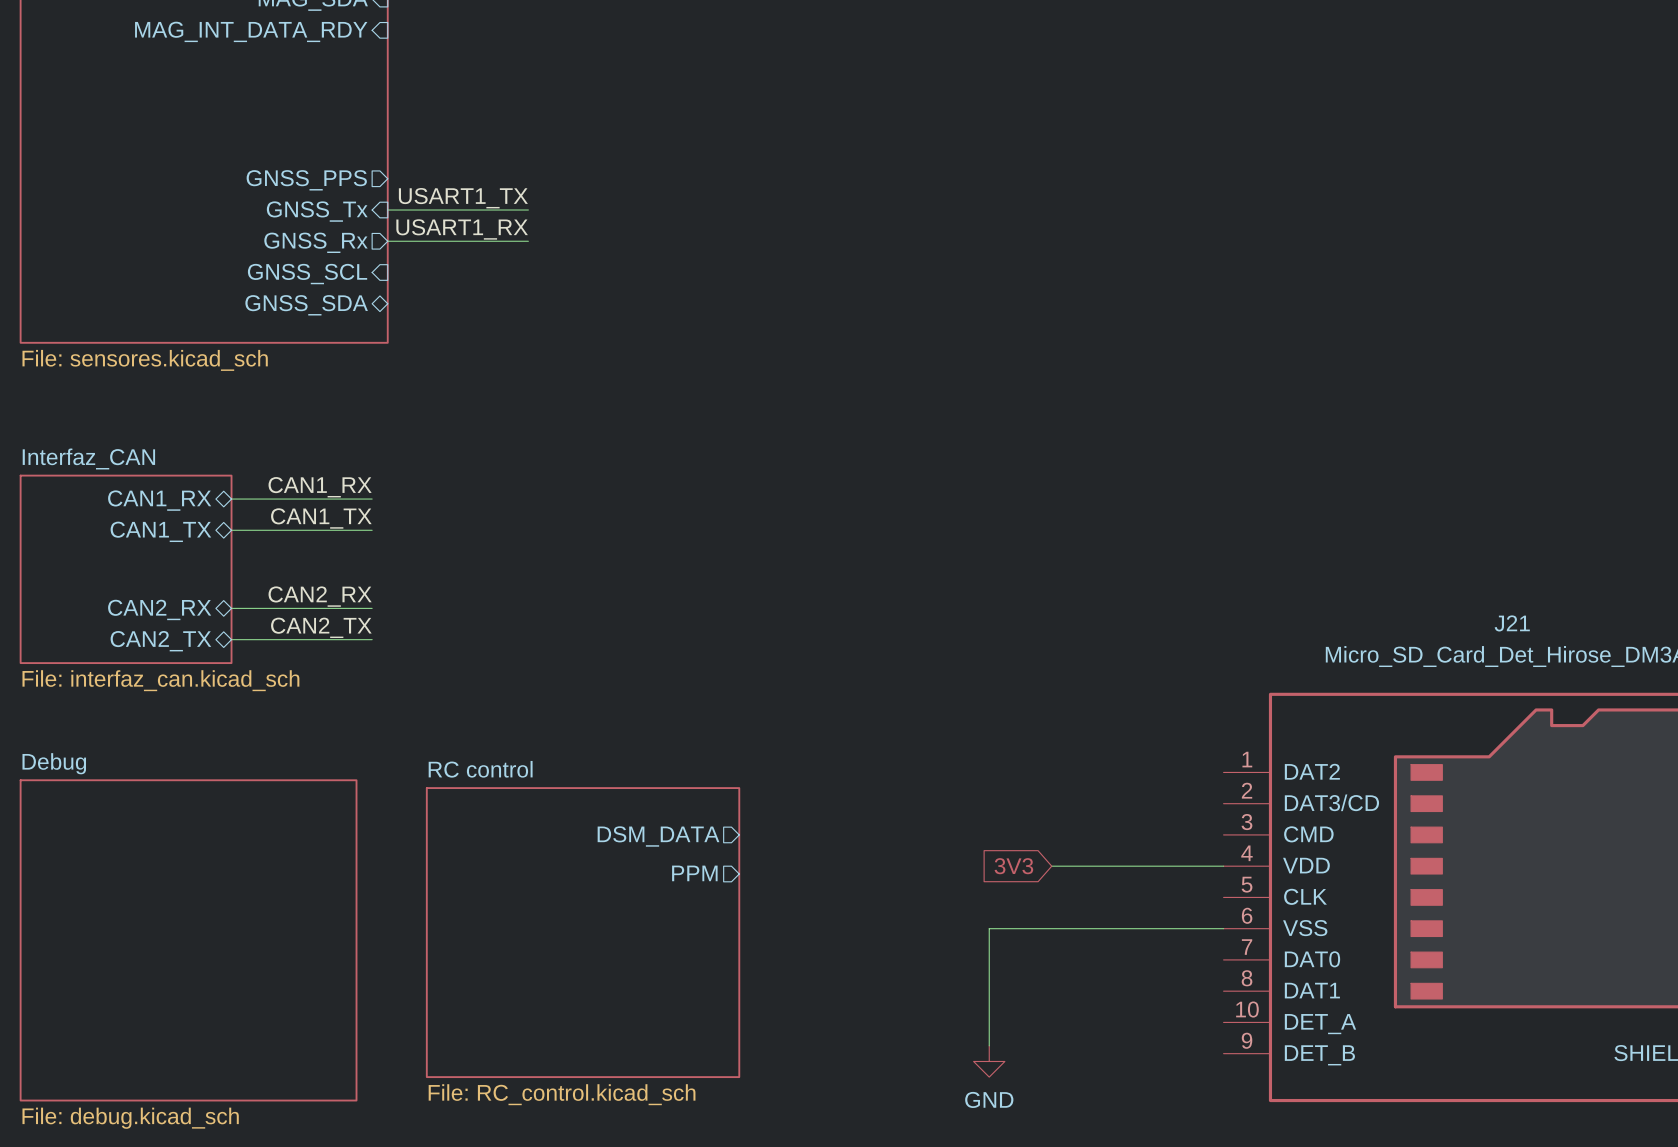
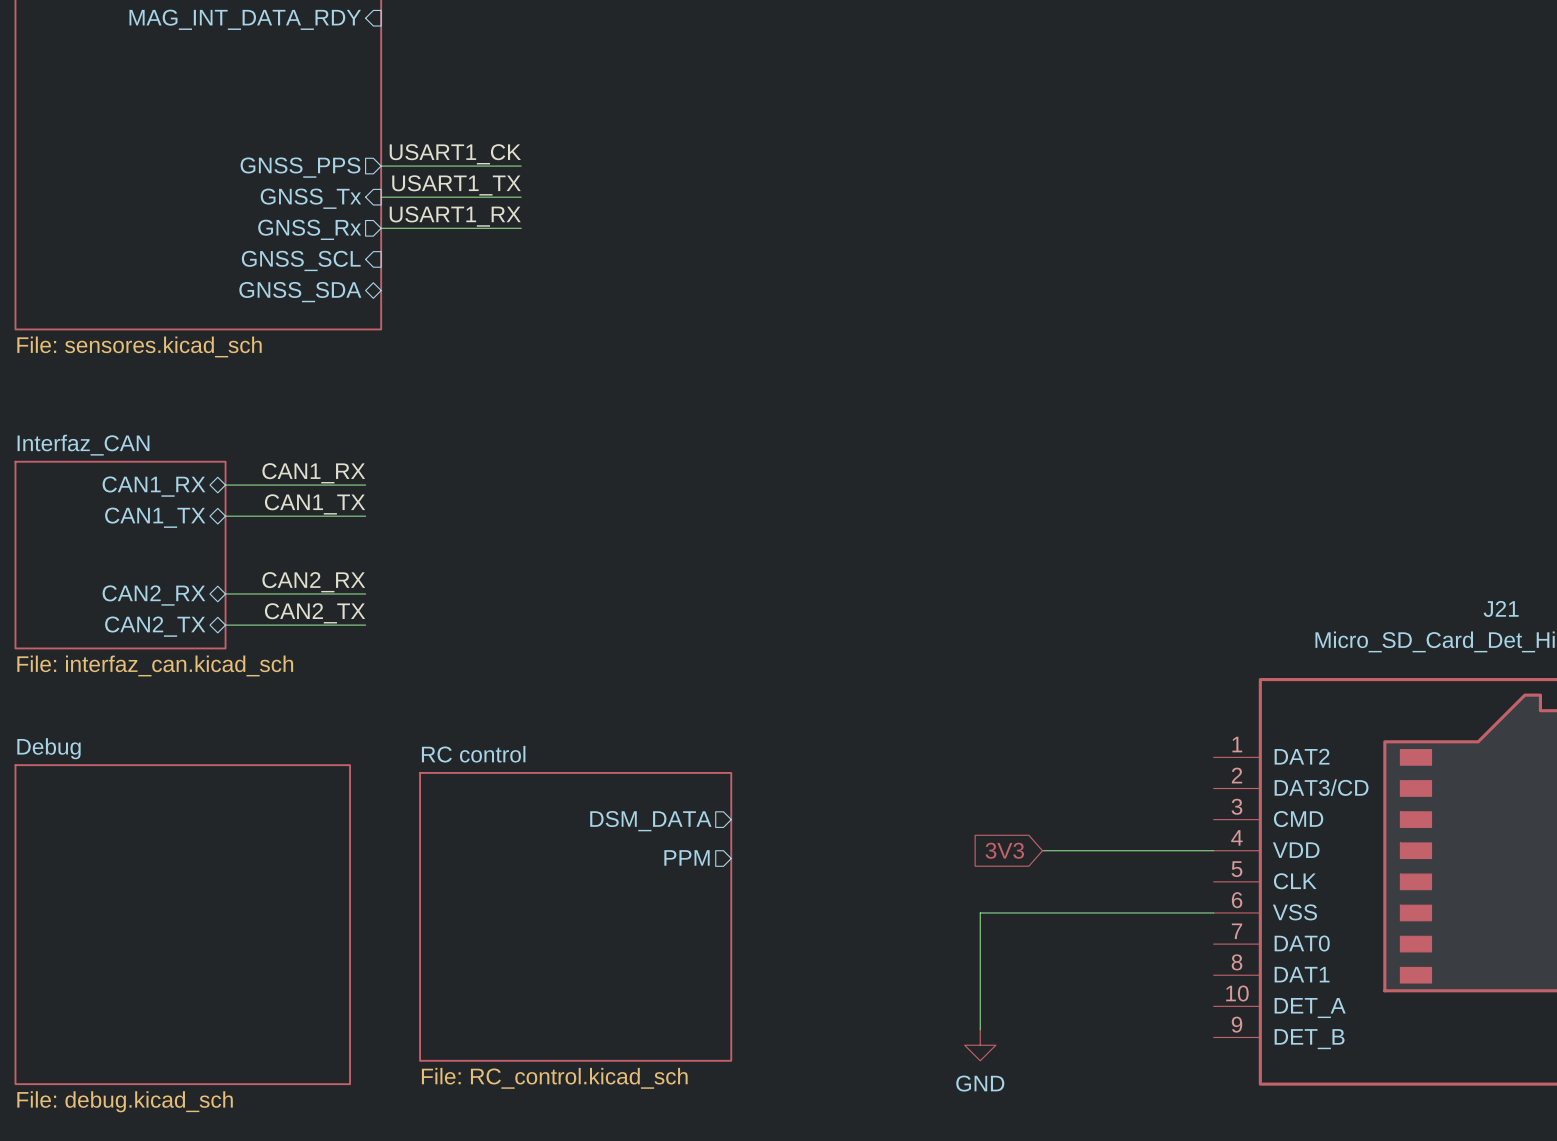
label: none -> USART1_CK (455, 154)
wire: none -> (381, 166) (521, 166)

